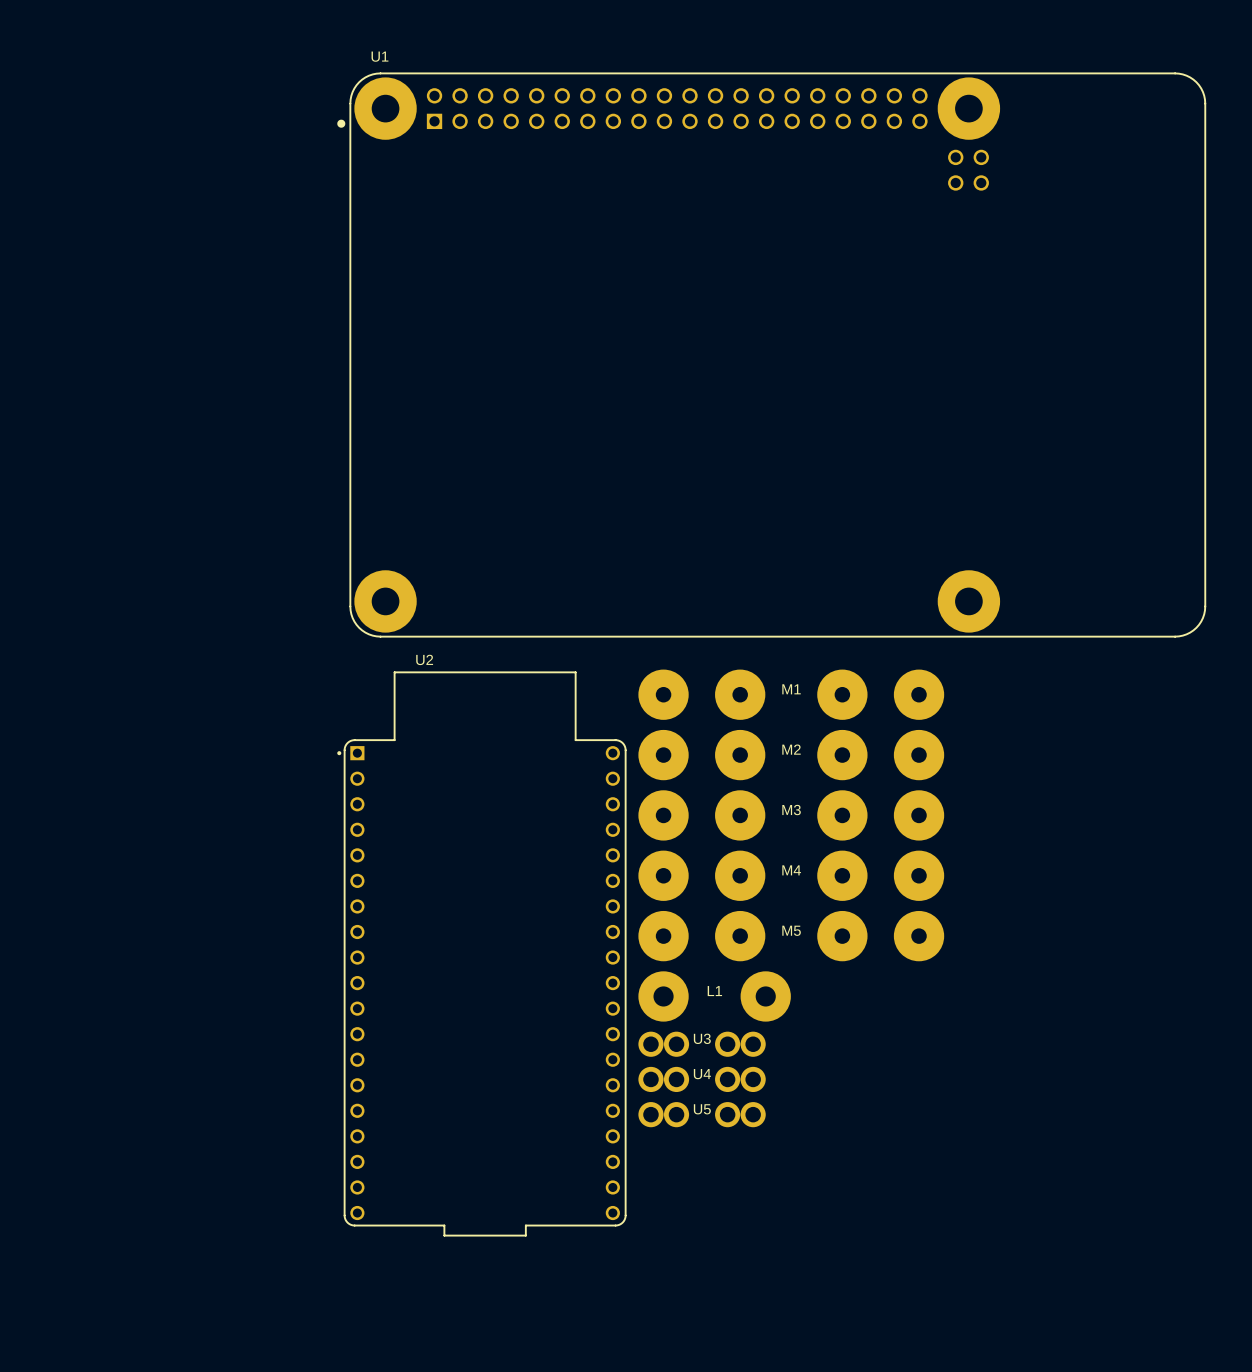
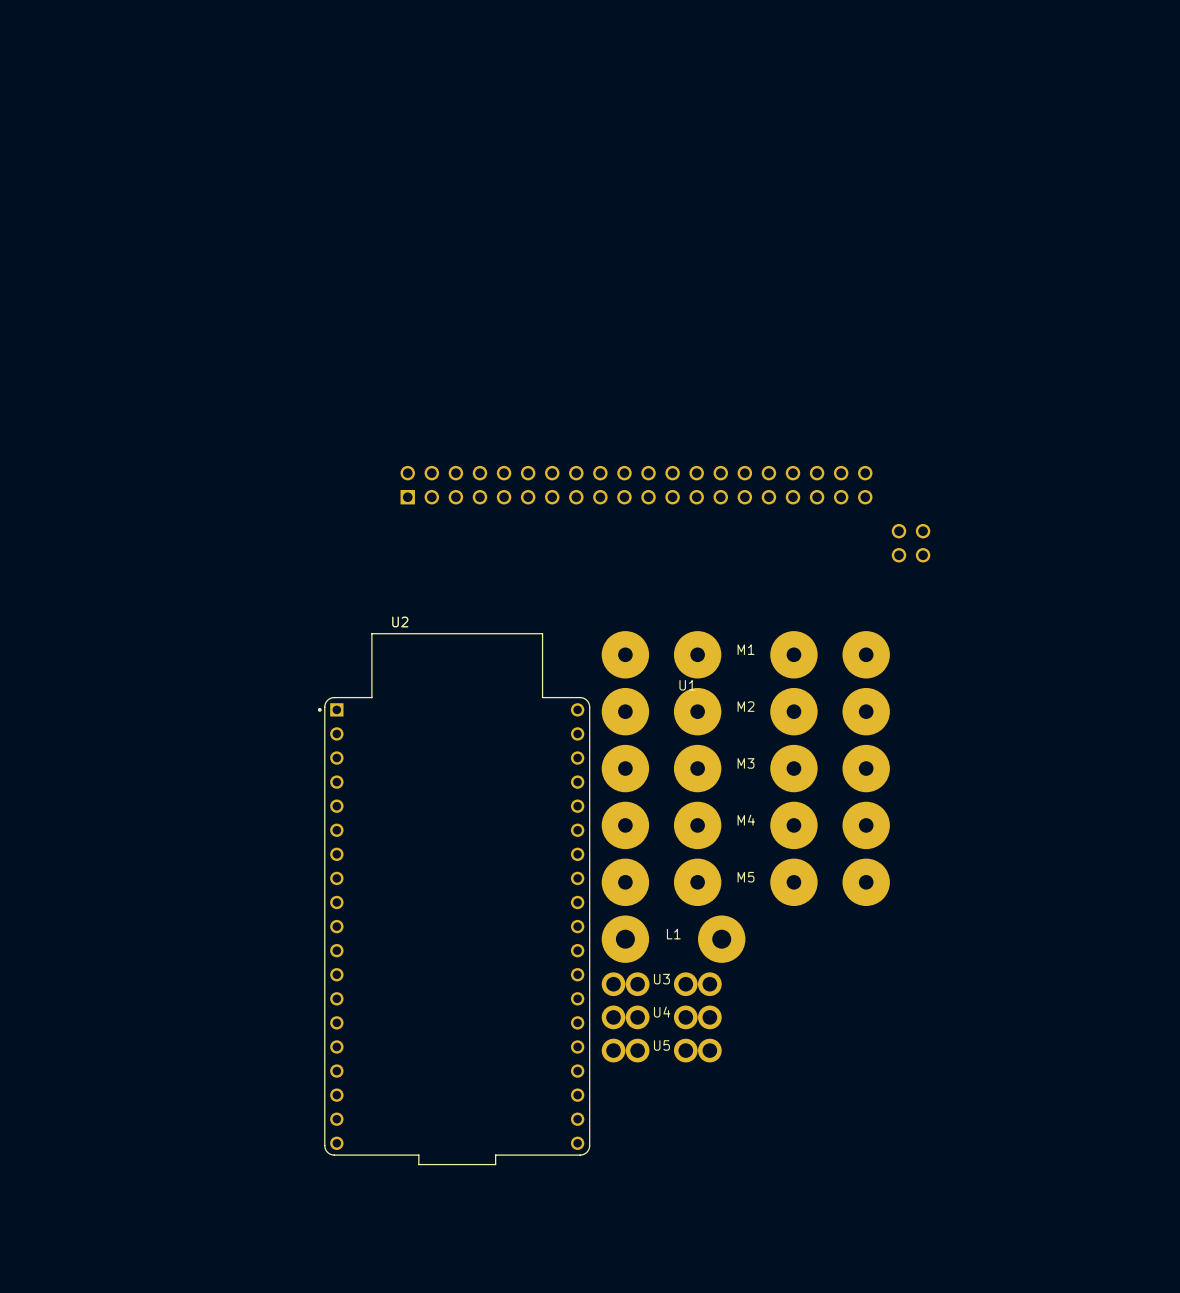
U1 name position: U1 (379, 56) -> U1 (687, 685)
U1 footprint: [337, 72, 1206, 638] -> [400, 465, 931, 563]

